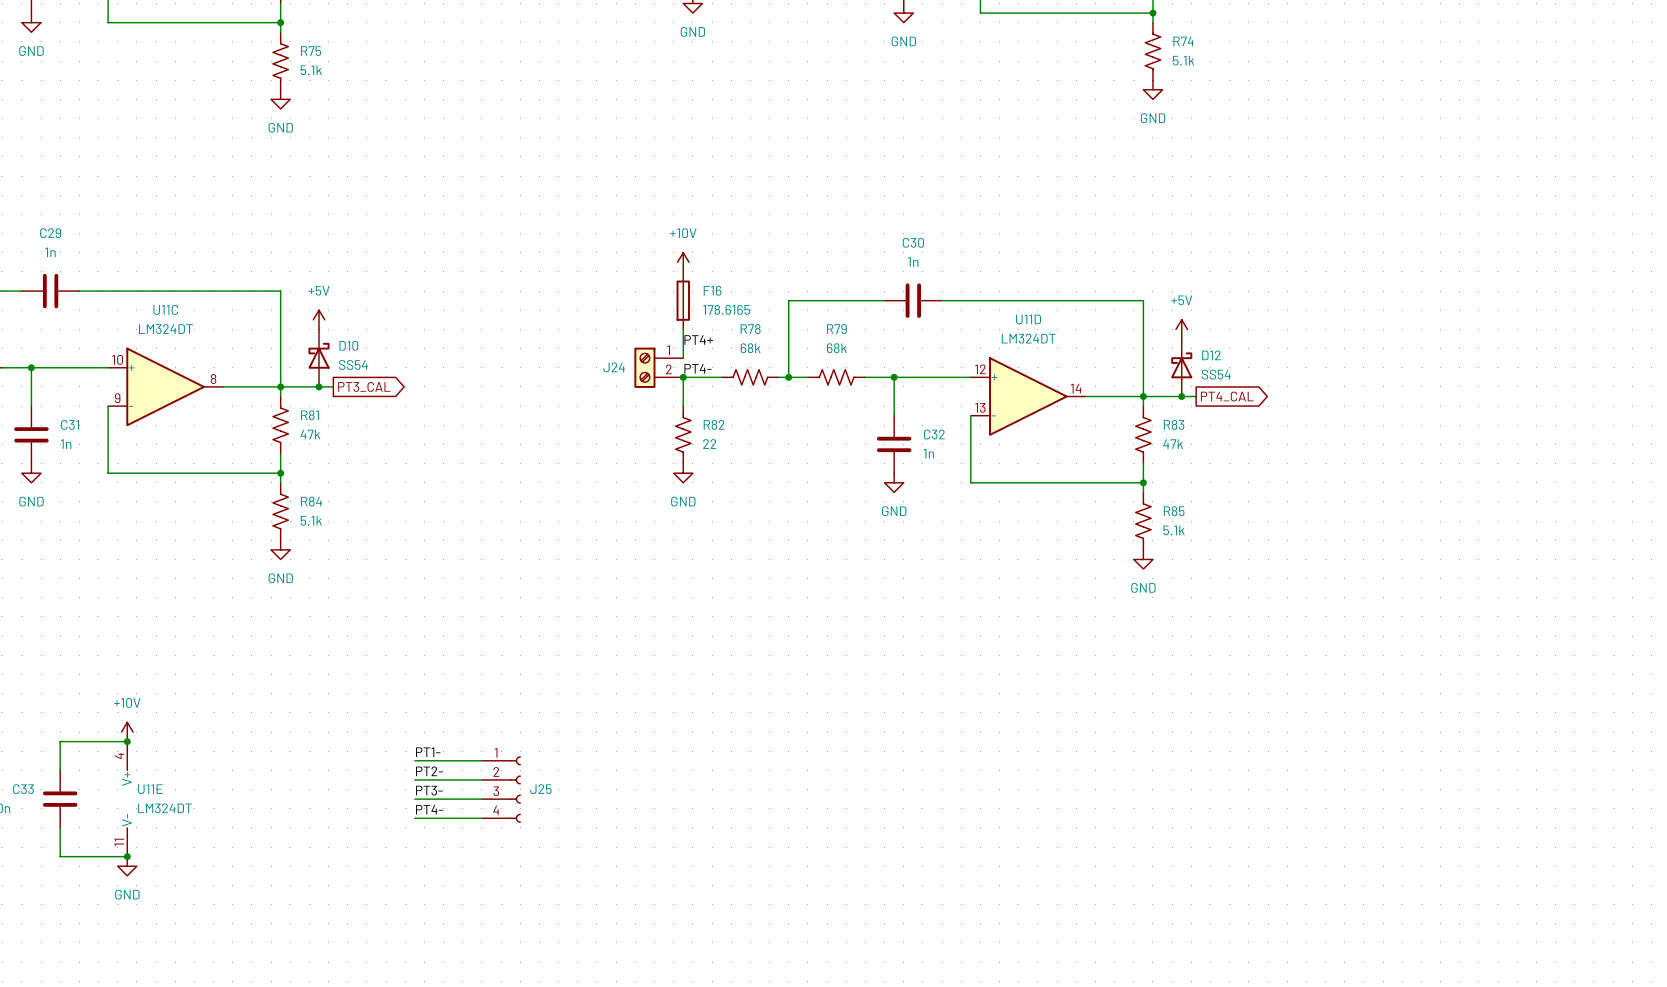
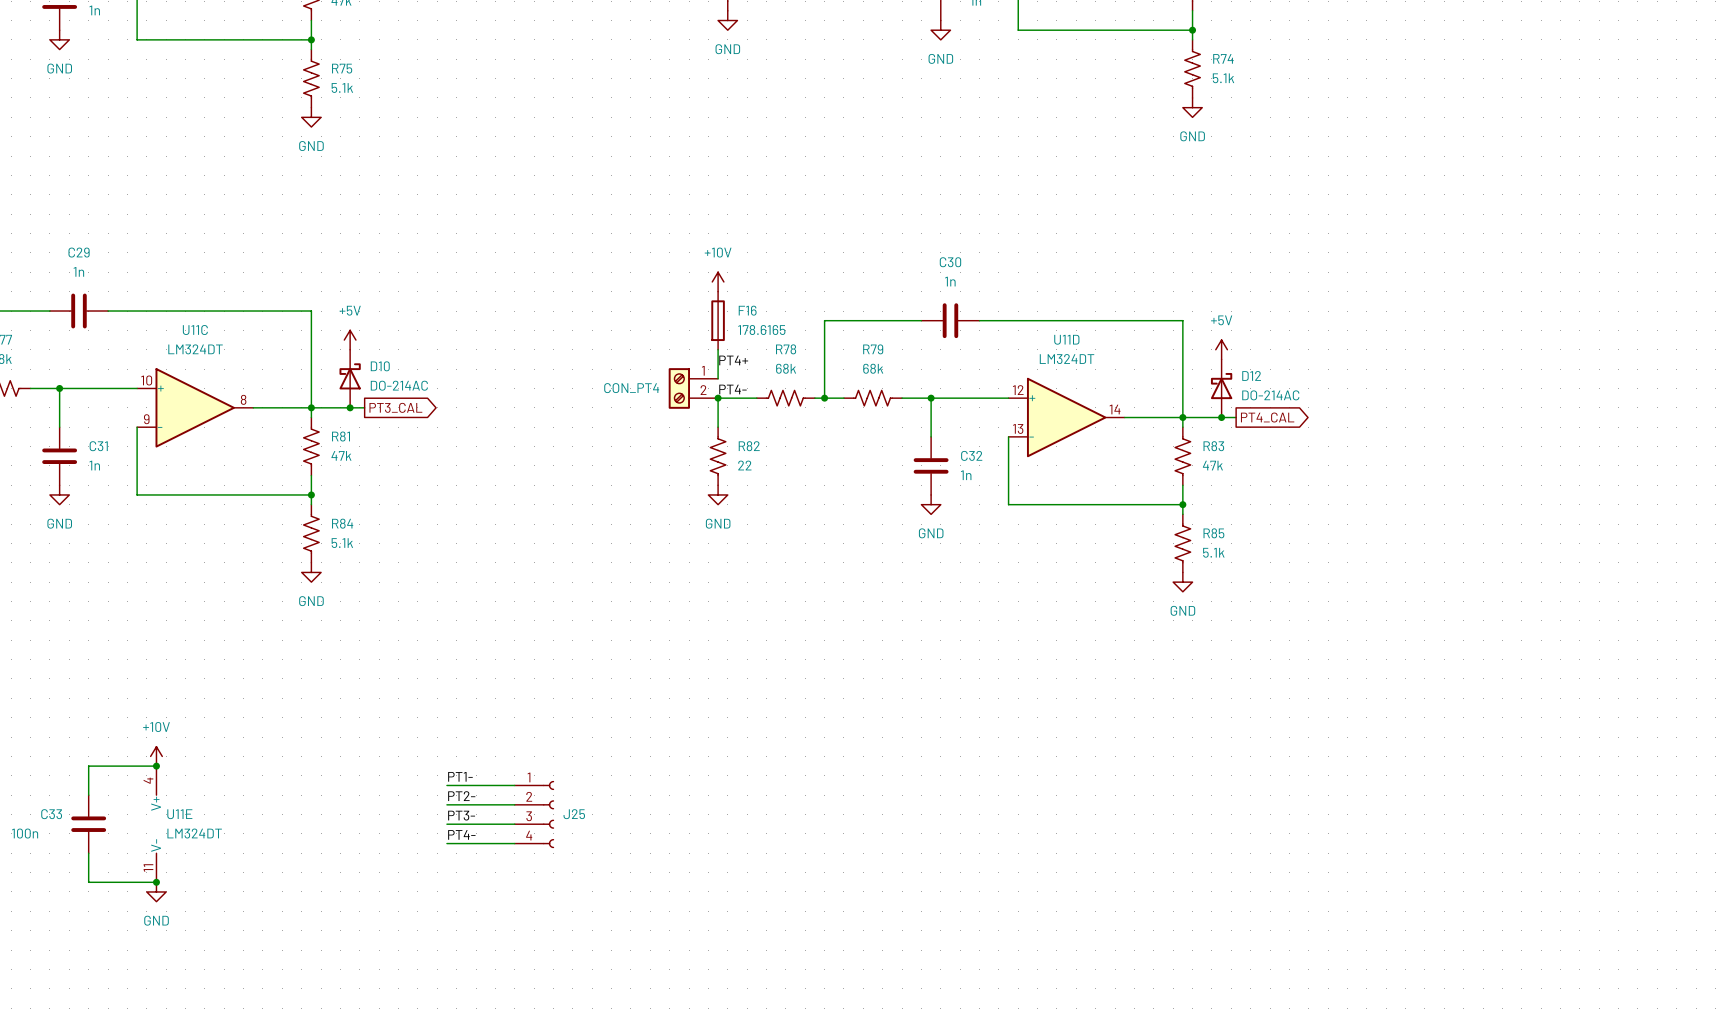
D10 value: SS54 (353, 365) -> DO-214AC (399, 385)
J24 name: J24 (614, 367) -> CON_PT4 (631, 388)
D12 value: SS54 (1216, 374) -> DO-214AC (1270, 395)

